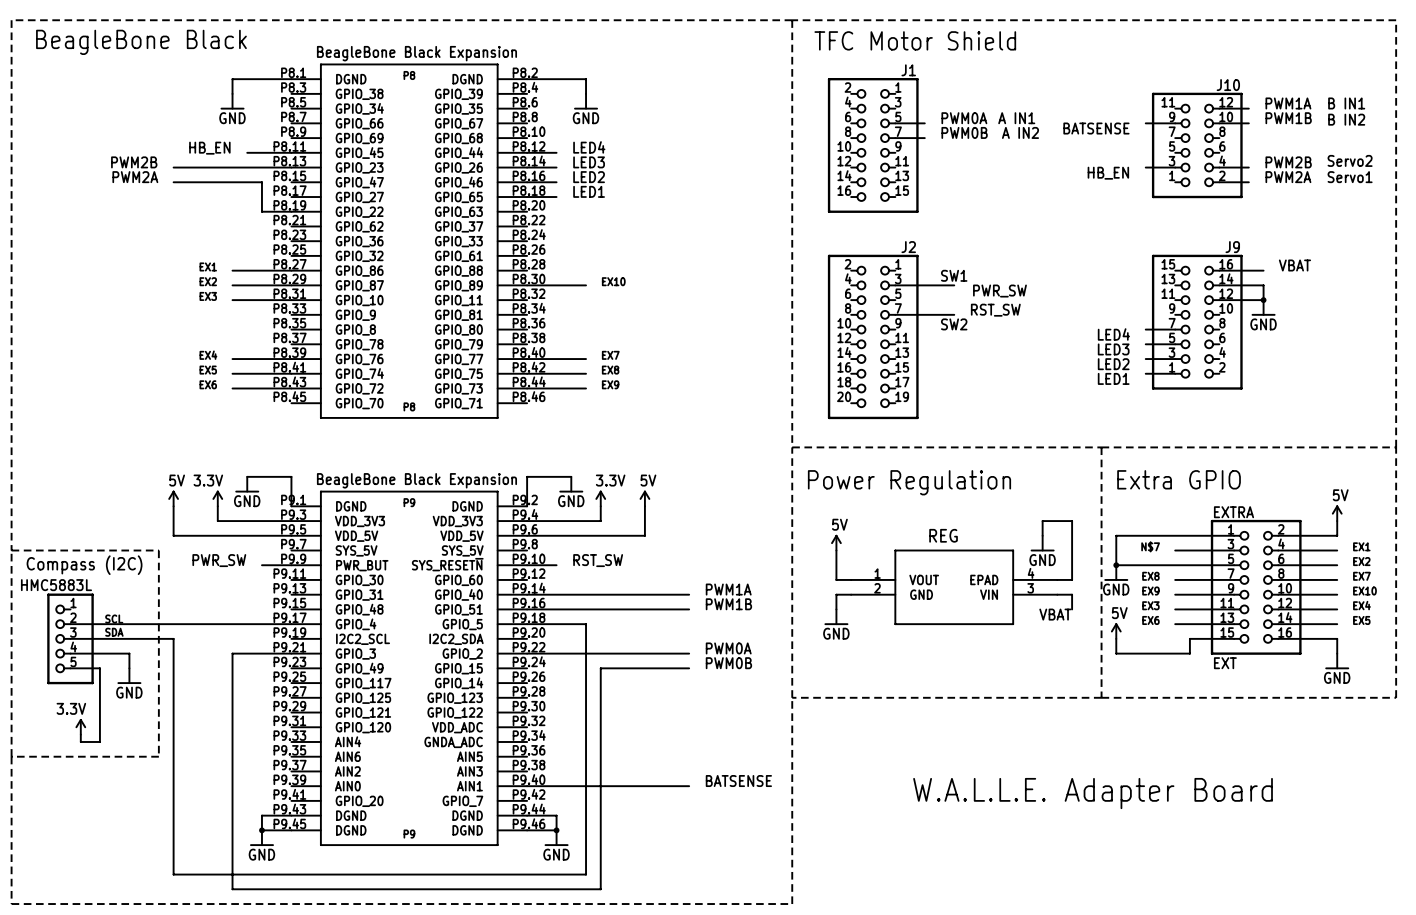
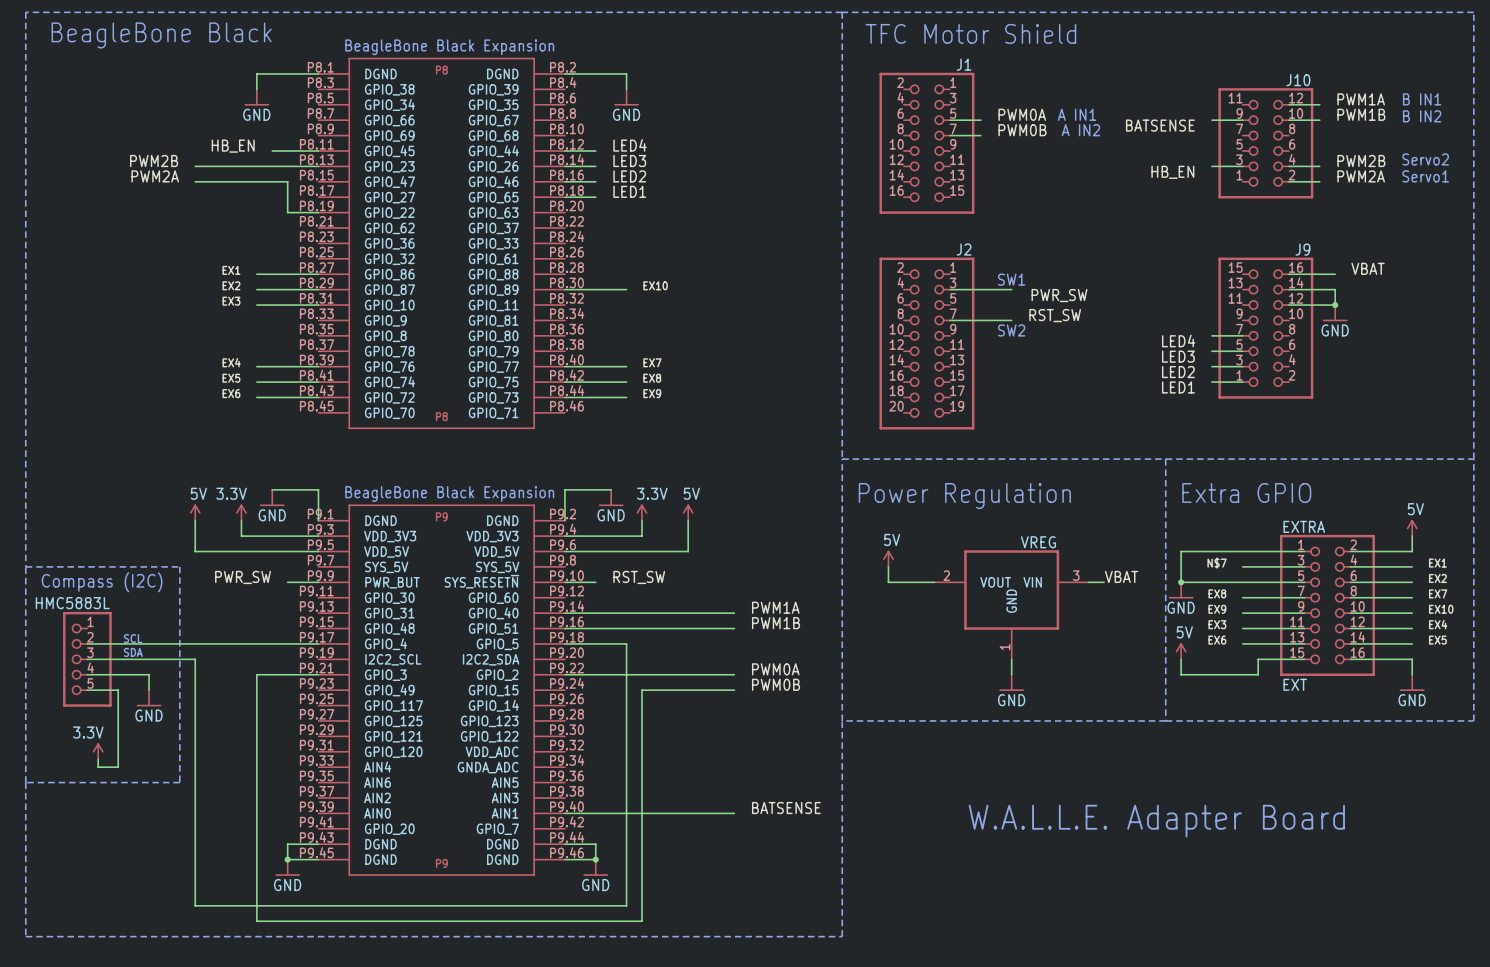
wire: (1042, 535) (1042, 521) (1072, 521) (1072, 579) (1057, 579) -> none
power symbol: GND (1042, 543) -> none
wire: (836, 565) (836, 579) (851, 579) -> (888, 582) (934, 582)
wire: none -> (1088, 582) (1104, 582)
VREG: none -> (1011, 604)
REG: (954, 587) -> none
wire: (851, 594) (836, 594) (836, 609) -> none
wire: (1057, 594) (1072, 594) (1072, 609) -> none
label position: VBAT (1055, 614) -> VBAT (1121, 576)
power symbol: GND (836, 617) -> none
wire: none -> (1011, 659) (1011, 674)
power symbol: none -> GND (1011, 682)

